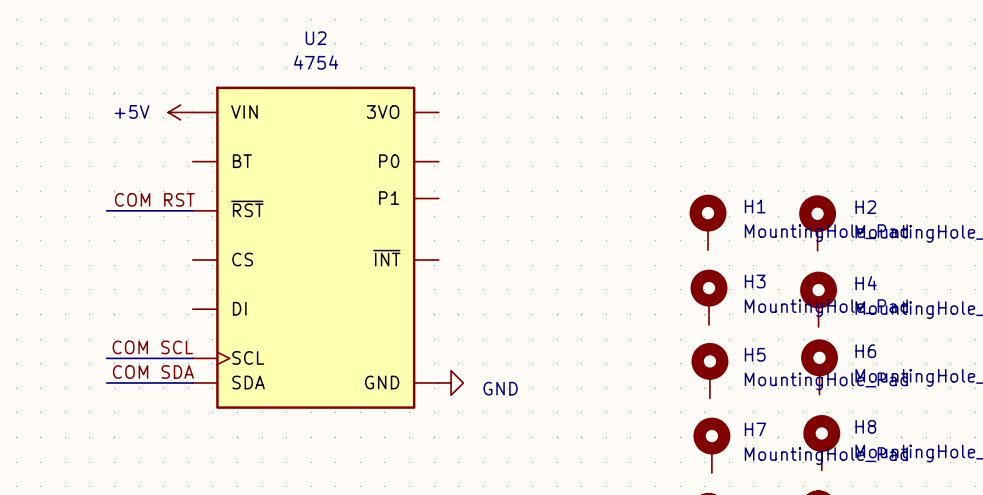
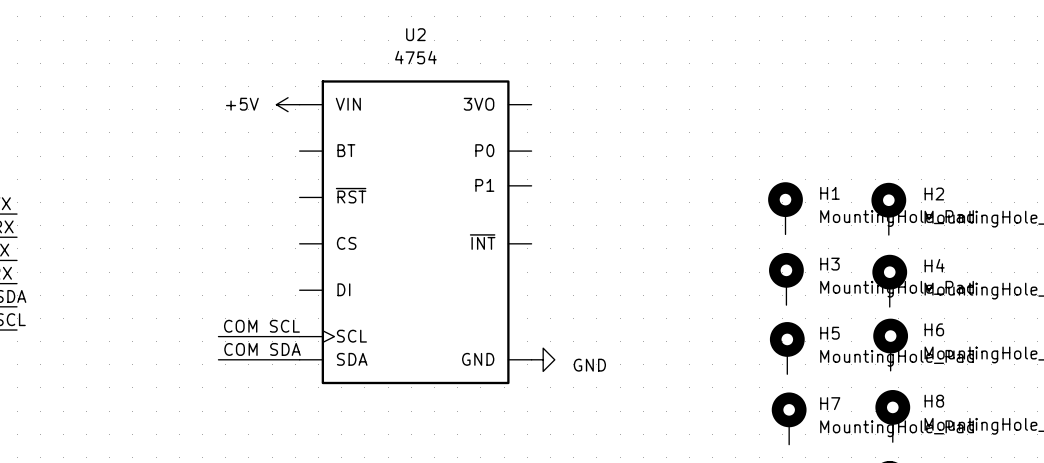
label: COM RST (154, 199) -> none
wire: (106, 210) (192, 210) -> none

